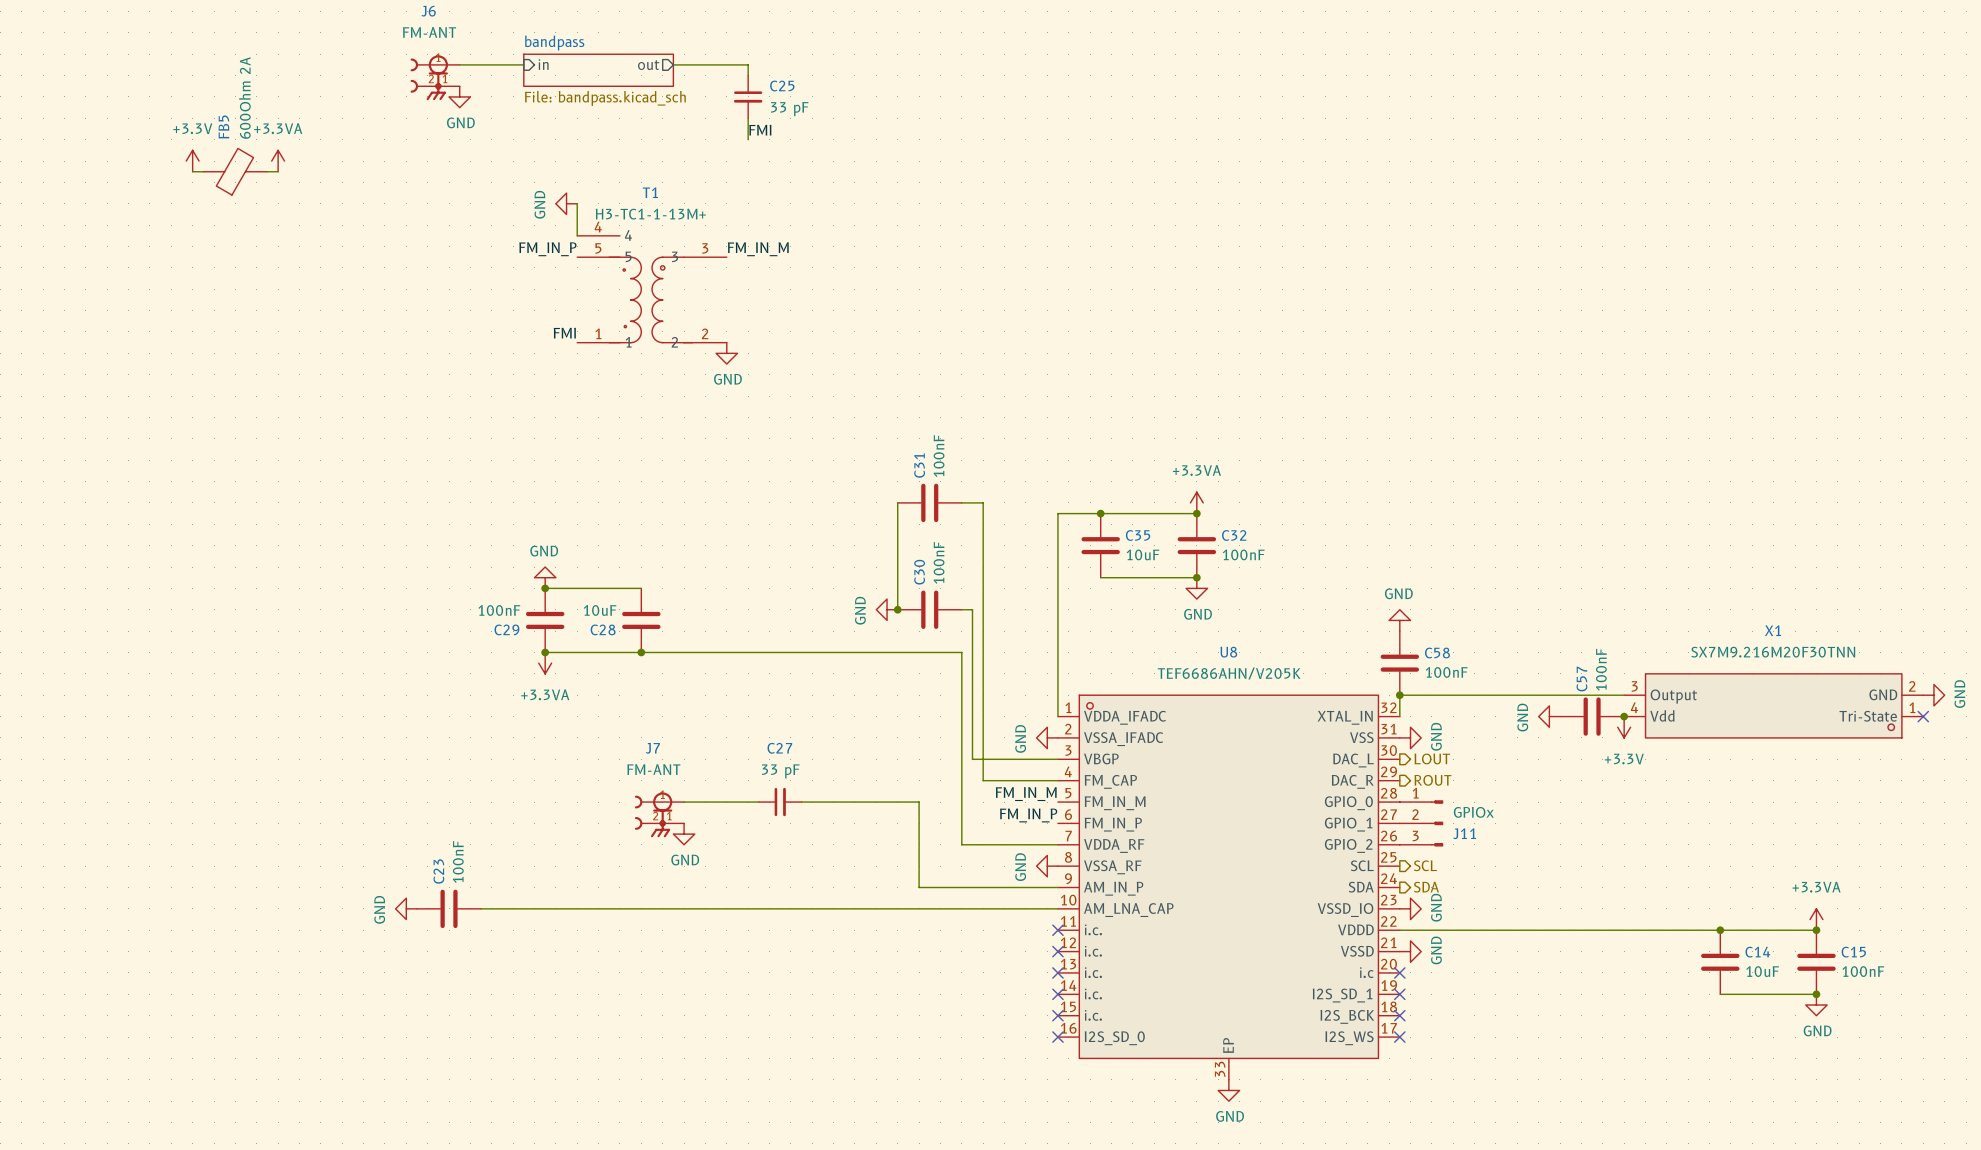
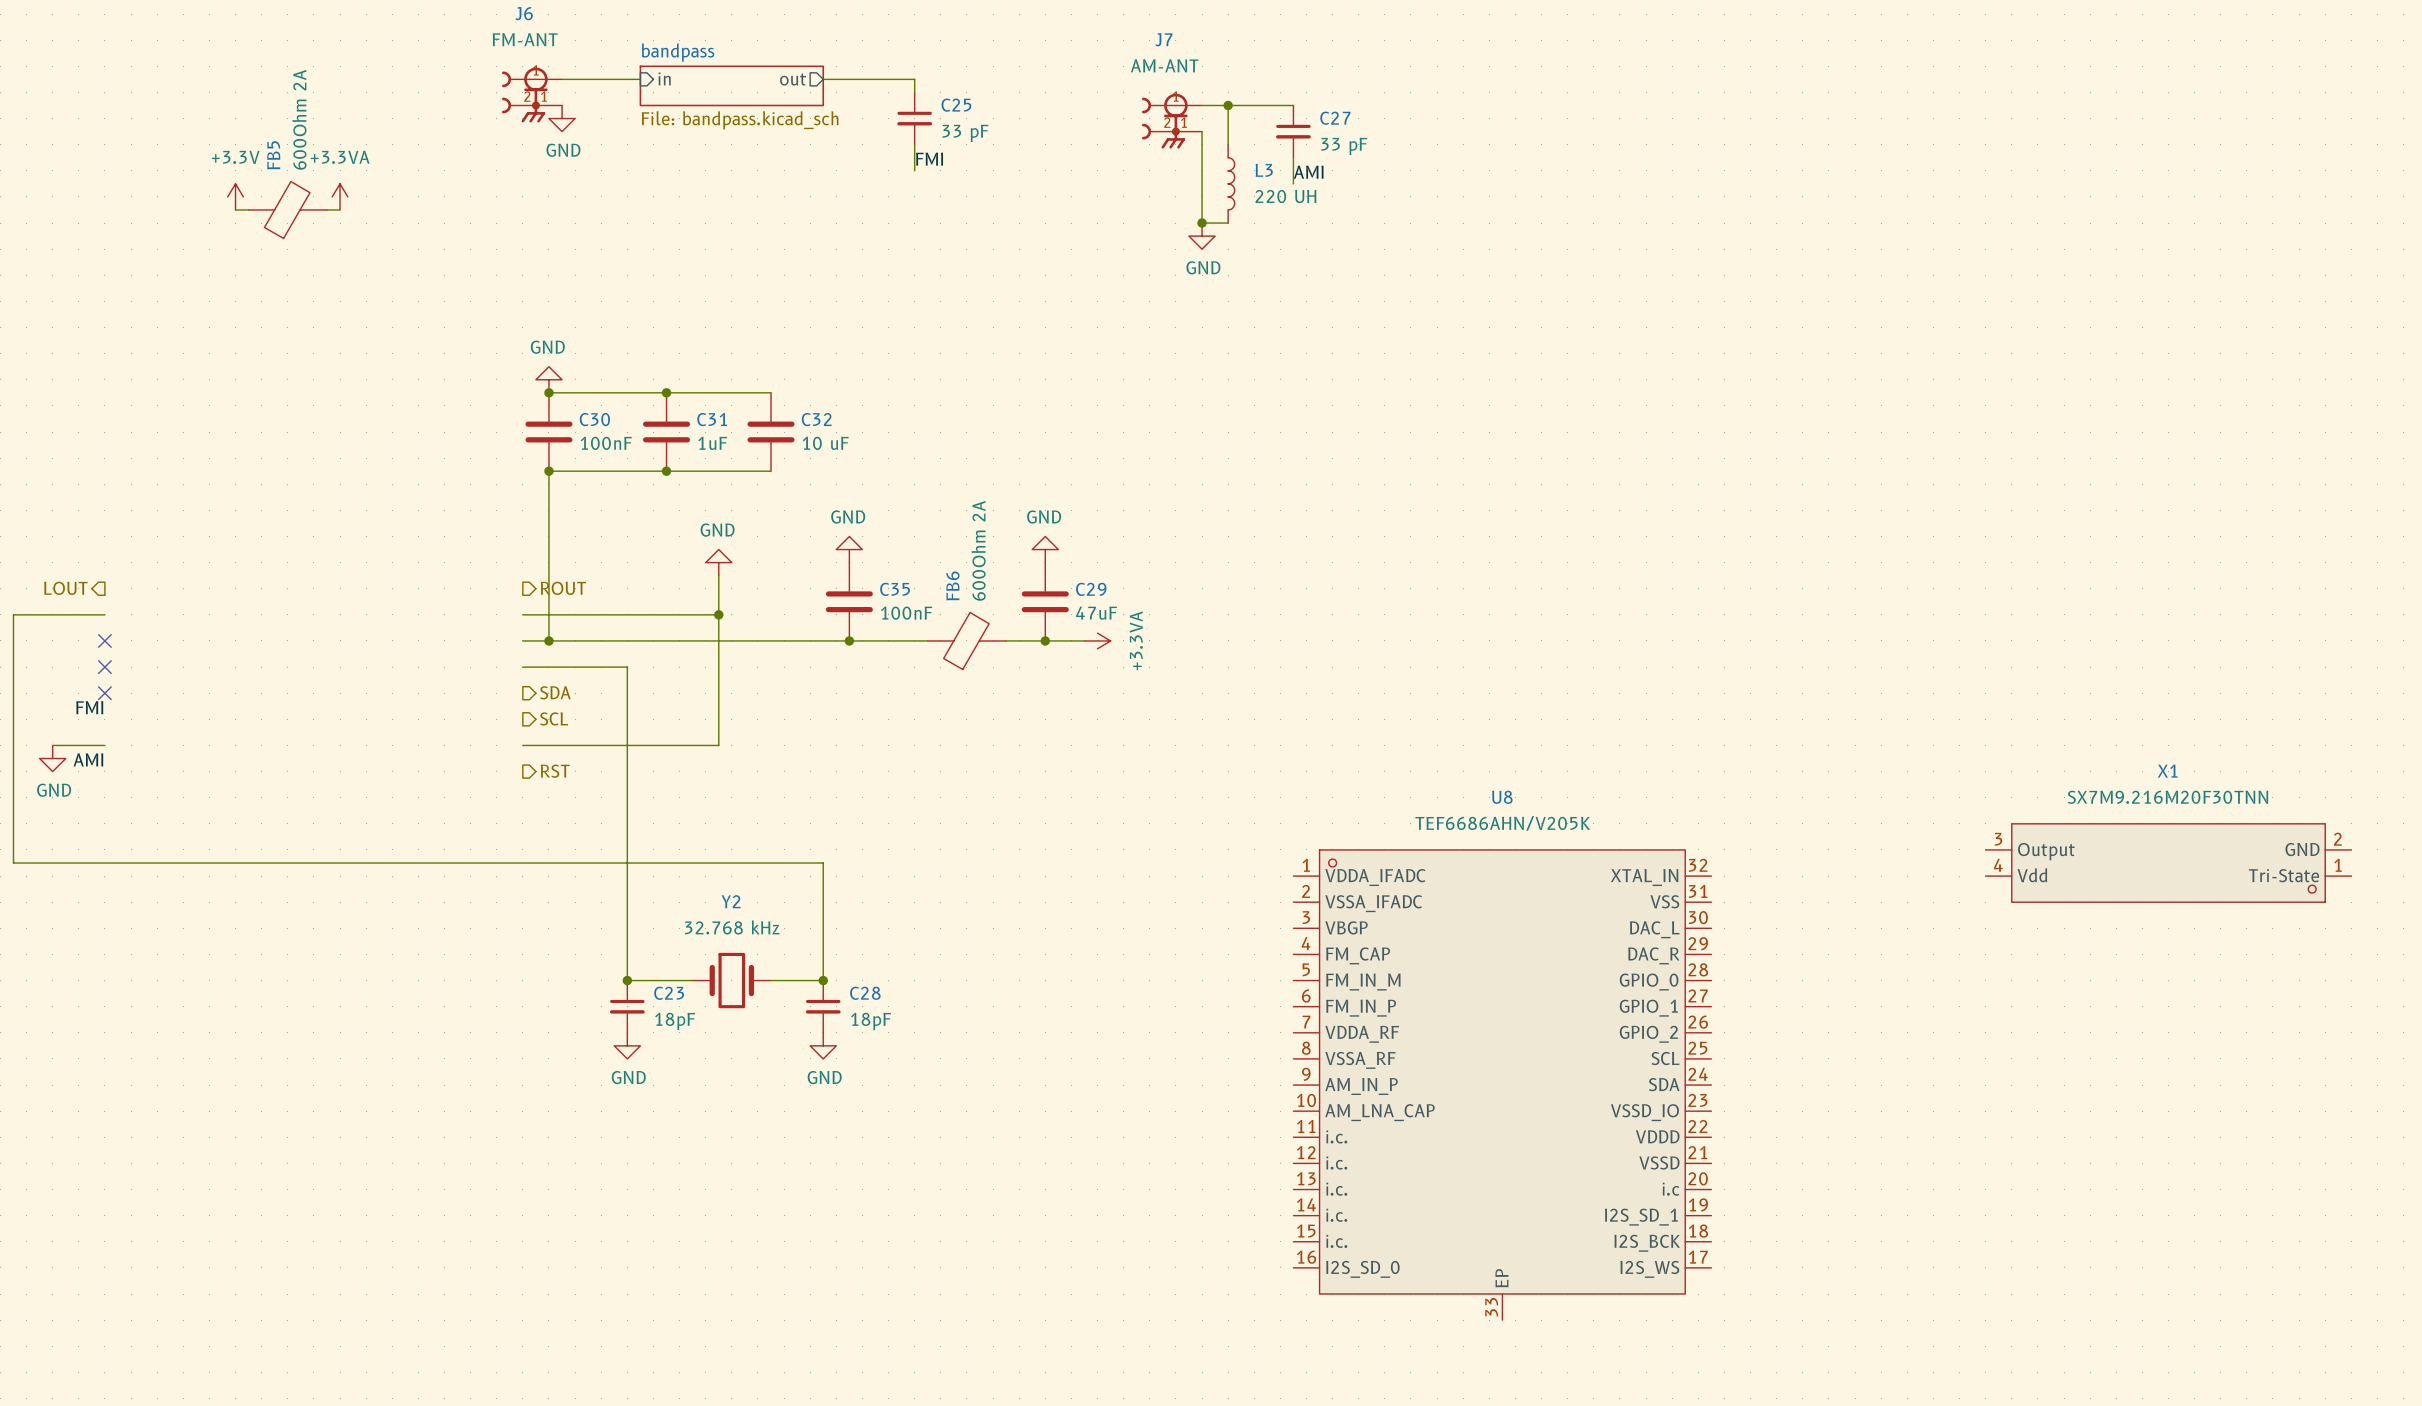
wire: none -> (1202, 105) (1293, 105)
wire: none -> (1228, 105) (1228, 144)
junction: none -> (1228, 105)
wire: none -> (1202, 131) (1202, 223) (1228, 223)
wire: none -> (1293, 157) (1293, 183)
label: none -> AMI (1308, 172)
L3: none -> 220 UH (1231, 183)
junction: none -> (1202, 223)
power symbol: none -> GND (1202, 236)
power symbol: GND (566, 203) -> none
wire: (577, 203) (577, 235) -> none
label: FM_IN_P (547, 249) -> none
label: FM_IN_M (758, 249) -> none
T1: H3-TC1-1-13M+ (652, 289) -> none
power symbol: none -> GND (548, 379)
wire: none -> (548, 392) (771, 392)
junction: none -> (548, 392)
junction: none -> (666, 392)
label: FMI (564, 333) -> none
power symbol: GND (726, 353) -> none
junction: none -> (548, 471)
junction: none -> (666, 471)
wire: none -> (771, 471) (548, 471) (548, 640)
power symbol: none -> GND (849, 549)
power symbol: none -> GND (1045, 549)
C31 value: 100nF (939, 456) -> 1uF (712, 443)
power symbol: none -> GND (718, 562)
wire: none -> (718, 575) (718, 745) (522, 745)
hierarchical label: none -> LOUT (65, 588)
hierarchical label: none -> ROUT (563, 588)
wire: none -> (104, 614) (13, 614) (13, 863) (823, 863) (823, 980) (771, 980)
wire: none -> (522, 614) (718, 614)
junction: none -> (718, 614)
wire: (897, 502) (897, 609) -> none
C31 rotation: 0° (929, 502) -> 90° clockwise (666, 432)
C31 position: (929, 502) -> (666, 432)
wire: (961, 502) (983, 502) (983, 780) (1057, 780) -> none
power symbol: +3.3VA (1196, 502) -> none
junction: (1100, 513) -> none
wire: (1196, 513) (1057, 513) (1057, 716) -> none
junction: (1196, 513) -> none
no-connect mark: none -> (104, 640)
wire: none -> (522, 640) (927, 640)
junction: none -> (548, 640)
junction: none -> (849, 640)
FB6: none -> 600Ohm 2A (966, 640)
wire: none -> (1006, 640) (1084, 640)
junction: none -> (1045, 640)
power symbol: none -> +3.3VA (1097, 640)
no-connect mark: none -> (104, 667)
wire: none -> (522, 667) (627, 667) (627, 980) (692, 980)
C35 position: (1100, 545) -> (849, 601)
C32 position: (1196, 545) -> (771, 432)
C35 value: 10uF (1142, 554) -> 100nF (906, 613)
C32 value: 100nF (1243, 554) -> 10 uF (825, 443)
hierarchical label: none -> SDA (555, 692)
no-connect mark: none -> (104, 693)
power symbol: GND (545, 577) -> none
wire: (1100, 577) (1196, 577) -> none
junction: (1196, 577) -> none
label: none -> FMI (89, 707)
hierarchical label: none -> SCL (554, 718)
wire: (545, 588) (641, 588) -> none
junction: (545, 588) -> none
C28 symbol: [622, 588, 661, 653] -> [805, 980, 841, 1033]
power symbol: GND (1196, 588) -> none
wire: none -> (52, 745) (104, 745)
power symbol: GND (887, 609) -> none
junction: (897, 609) -> none
C30 rotation: 0° (929, 609) -> 90° clockwise (548, 432)
C30 position: (929, 609) -> (548, 432)
wire: (961, 609) (972, 609) (972, 759) (1057, 759) -> none
C29 value: 100nF (499, 610) -> 47uF (1096, 613)
C28 value: 10uF (600, 610) -> 18pF (871, 1021)
power symbol: none -> GND (52, 758)
C29 position: (545, 620) -> (1045, 601)
power symbol: GND (1399, 620) -> none
label: none -> AMI (88, 759)
C29 name position: C29 (506, 629) -> C29 (1091, 589)
C28 name position: C28 (603, 629) -> C28 (865, 993)
hierarchical label: none -> RST (555, 771)
wire: (545, 652) (961, 652) (961, 844) (1057, 844) -> none
junction: (545, 652) -> none
junction: (641, 652) -> none
power symbol: +3.3VA (545, 663) -> none
C58: 100nF (1399, 663) -> none
junction: (1399, 695) -> none
wire: (1624, 695) (1399, 695) (1399, 716) -> none
power symbol: GND (1933, 695) -> none
power symbol: GND (1549, 716) -> none
C57: 100nF (1592, 716) -> none
junction: (1624, 716) -> none
no-connect mark: (1923, 716) -> none
power symbol: +3.3V (1624, 727) -> none
power symbol: GND (1047, 737) -> none
power symbol: GND (1410, 737) -> none
C27 name position: C27 (779, 748) -> C27 (1335, 118)
hierarchical label: LOUT (1432, 758) -> none
J7 value: FM-ANT (653, 769) -> AM-ANT (1164, 65)
C27 value position: 33 pF (780, 771) -> 33 pF (1344, 146)
hierarchical label: ROUT (1432, 780) -> none
label: FM_IN_M (1026, 794) -> none
junction: none -> (627, 980)
Y2: none -> 32.768 kHz (731, 980)
junction: none -> (823, 980)
wire: (684, 802) (758, 802) -> none
C27 rotation: 0° (780, 802) -> 90° clockwise (1293, 131)
C27 position: (780, 802) -> (1293, 131)
wire: (801, 802) (919, 802) (919, 887) (1057, 887) -> none
J7 position: (659, 814) -> (1171, 121)
label: FM_IN_P (1028, 815) -> none
J11: GPIOx (1421, 823) -> none
power symbol position: GND (684, 834) -> GND (823, 1045)
power symbol: none -> GND (627, 1045)
C23 value: 100nF (458, 862) -> 18pF (675, 1021)
hierarchical label: SCL (1425, 865) -> none
power symbol: GND (1047, 866) -> none
C23 name position: C23 (438, 871) -> C23 (669, 993)
hierarchical label: SDA (1426, 887) -> none
C23 symbol: [416, 889, 482, 929] -> [609, 980, 645, 1033]
power symbol: GND (406, 908) -> none
wire: (481, 908) (1057, 908) -> none
power symbol: GND (1410, 908) -> none
power symbol: +3.3VA (1816, 919) -> none
no-connect mark: (1057, 930) -> none
wire: (1399, 930) (1816, 930) -> none
junction: (1720, 930) -> none
junction: (1816, 930) -> none
no-connect mark: (1057, 951) -> none
power symbol: GND (1410, 951) -> none
C14: 10uF (1720, 962) -> none
C15: 100nF (1816, 962) -> none
no-connect mark: (1057, 972) -> none
no-connect mark: (1399, 972) -> none
no-connect mark: (1057, 994) -> none
no-connect mark: (1399, 994) -> none
wire: (1720, 994) (1816, 994) -> none
junction: (1816, 994) -> none
power symbol: GND (1816, 1005) -> none
no-connect mark: (1057, 1015) -> none
no-connect mark: (1399, 1015) -> none
no-connect mark: (1057, 1037) -> none
no-connect mark: (1399, 1037) -> none
power symbol: GND (1228, 1090) -> none

